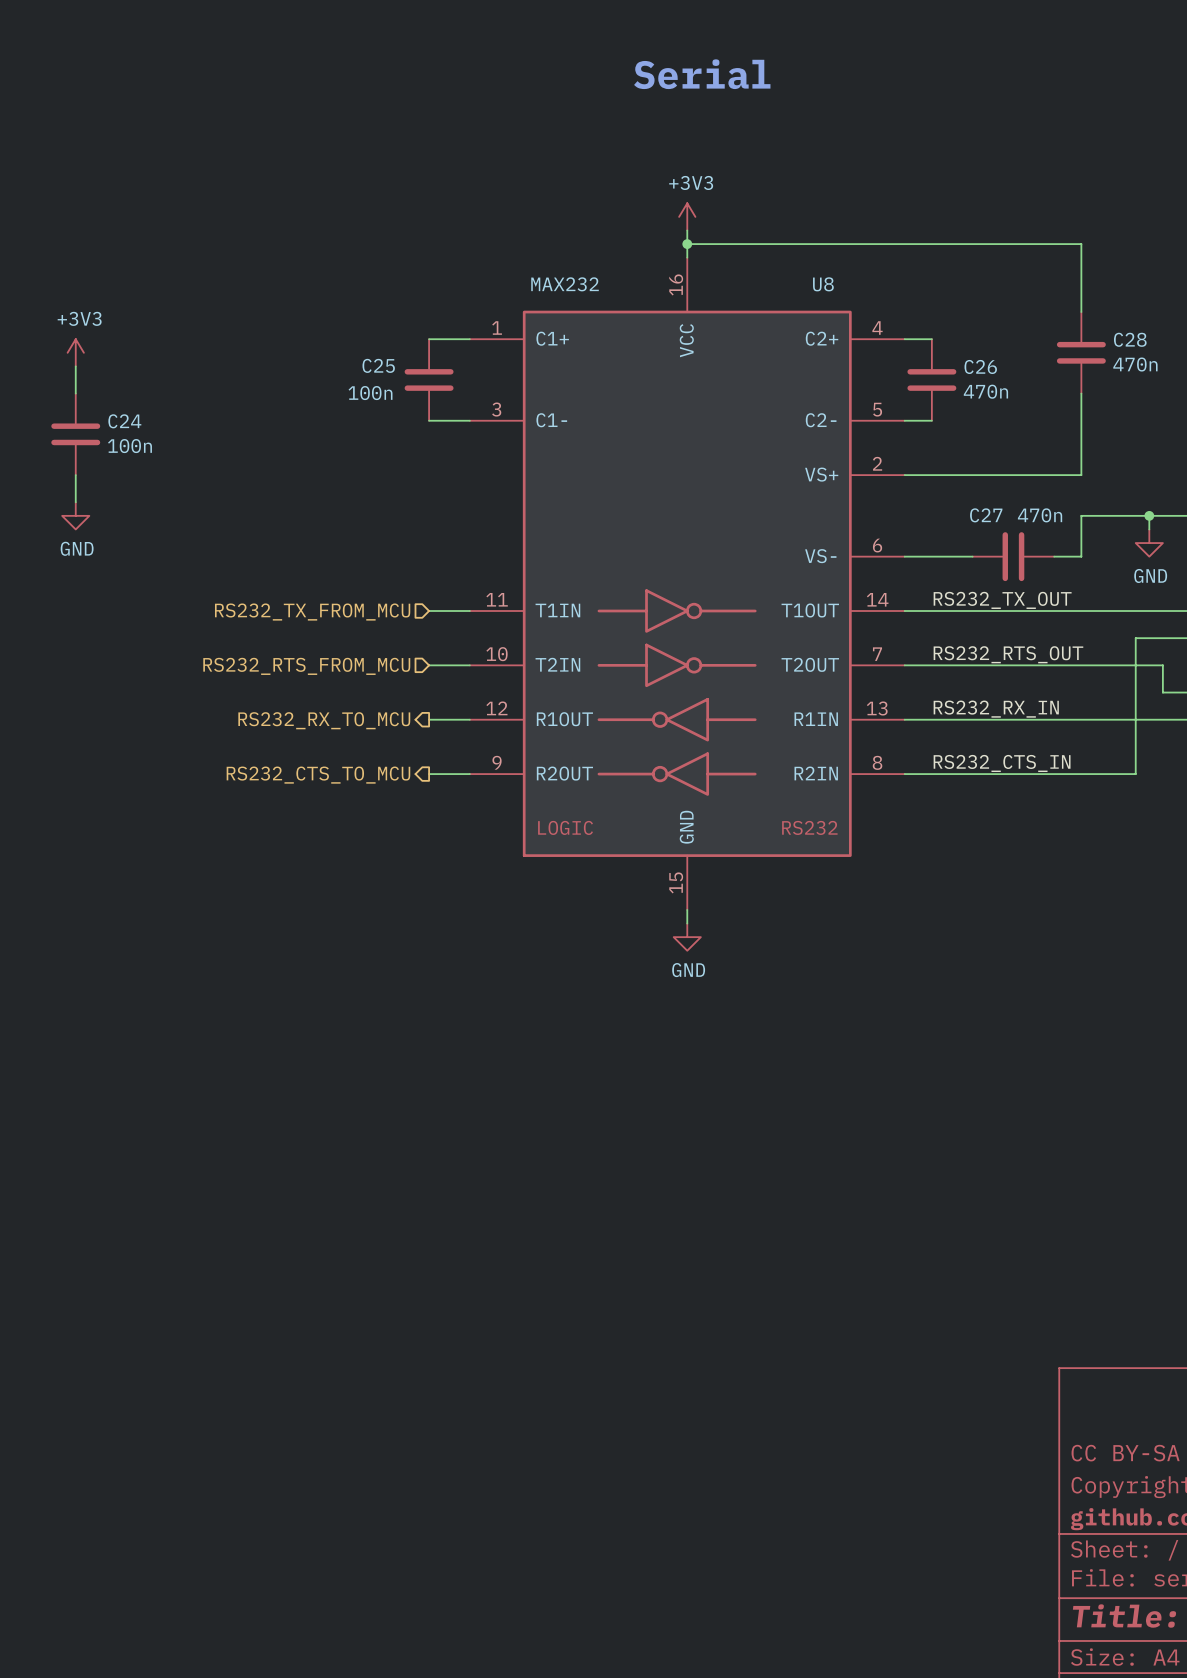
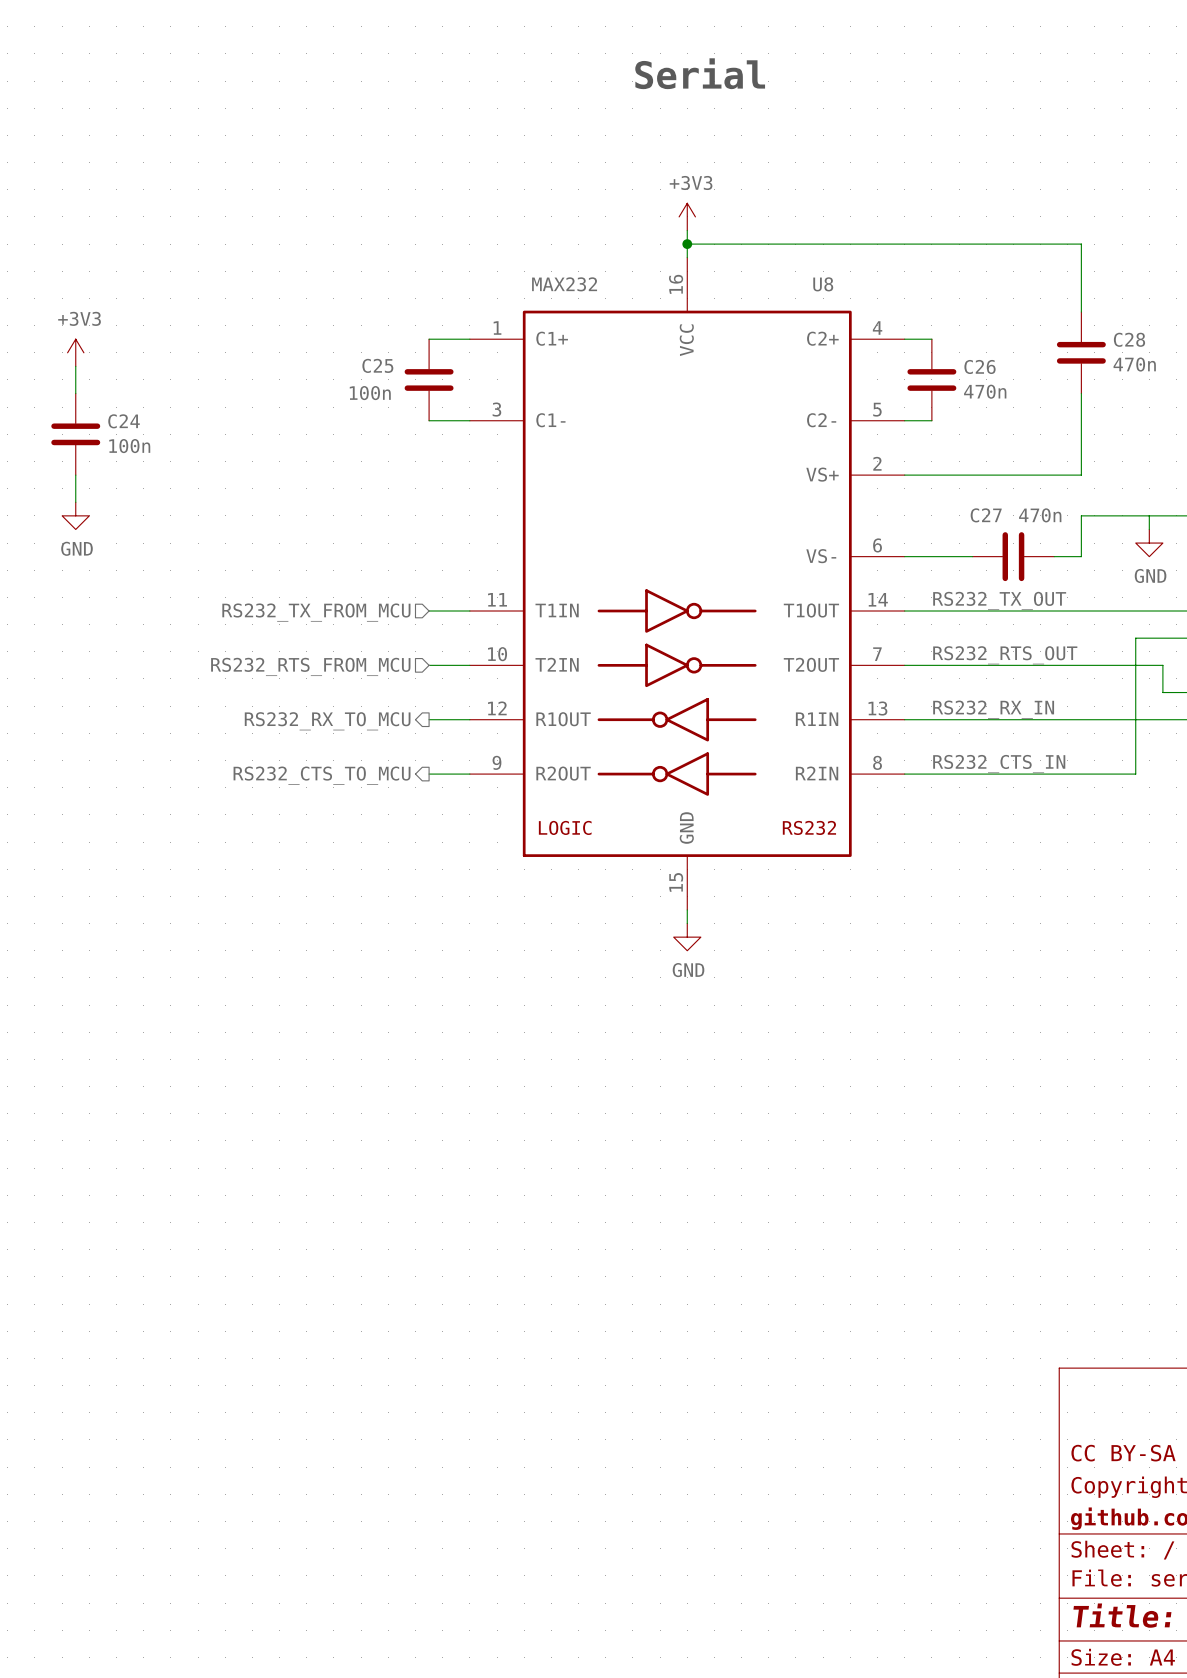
junction: (1149, 515) -> none

